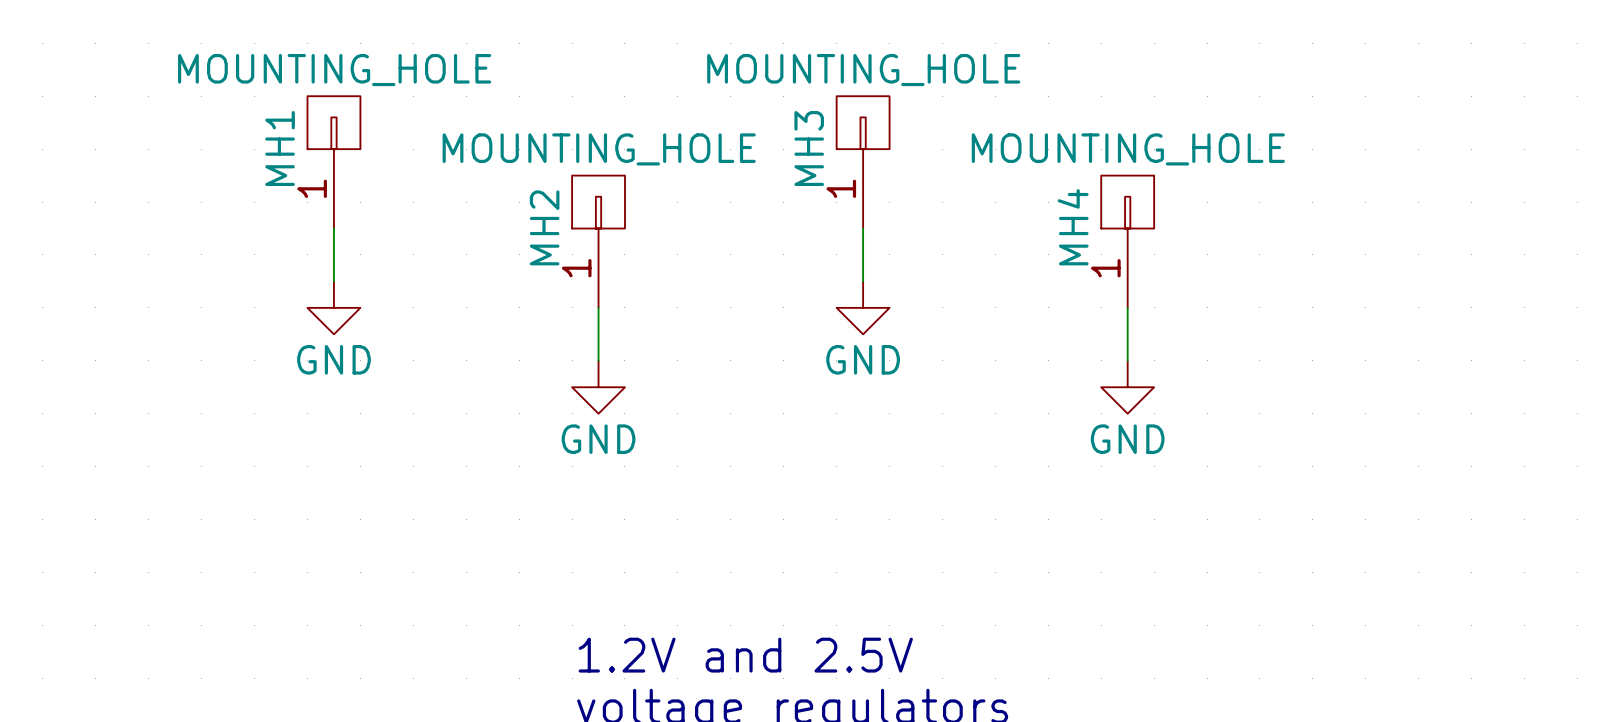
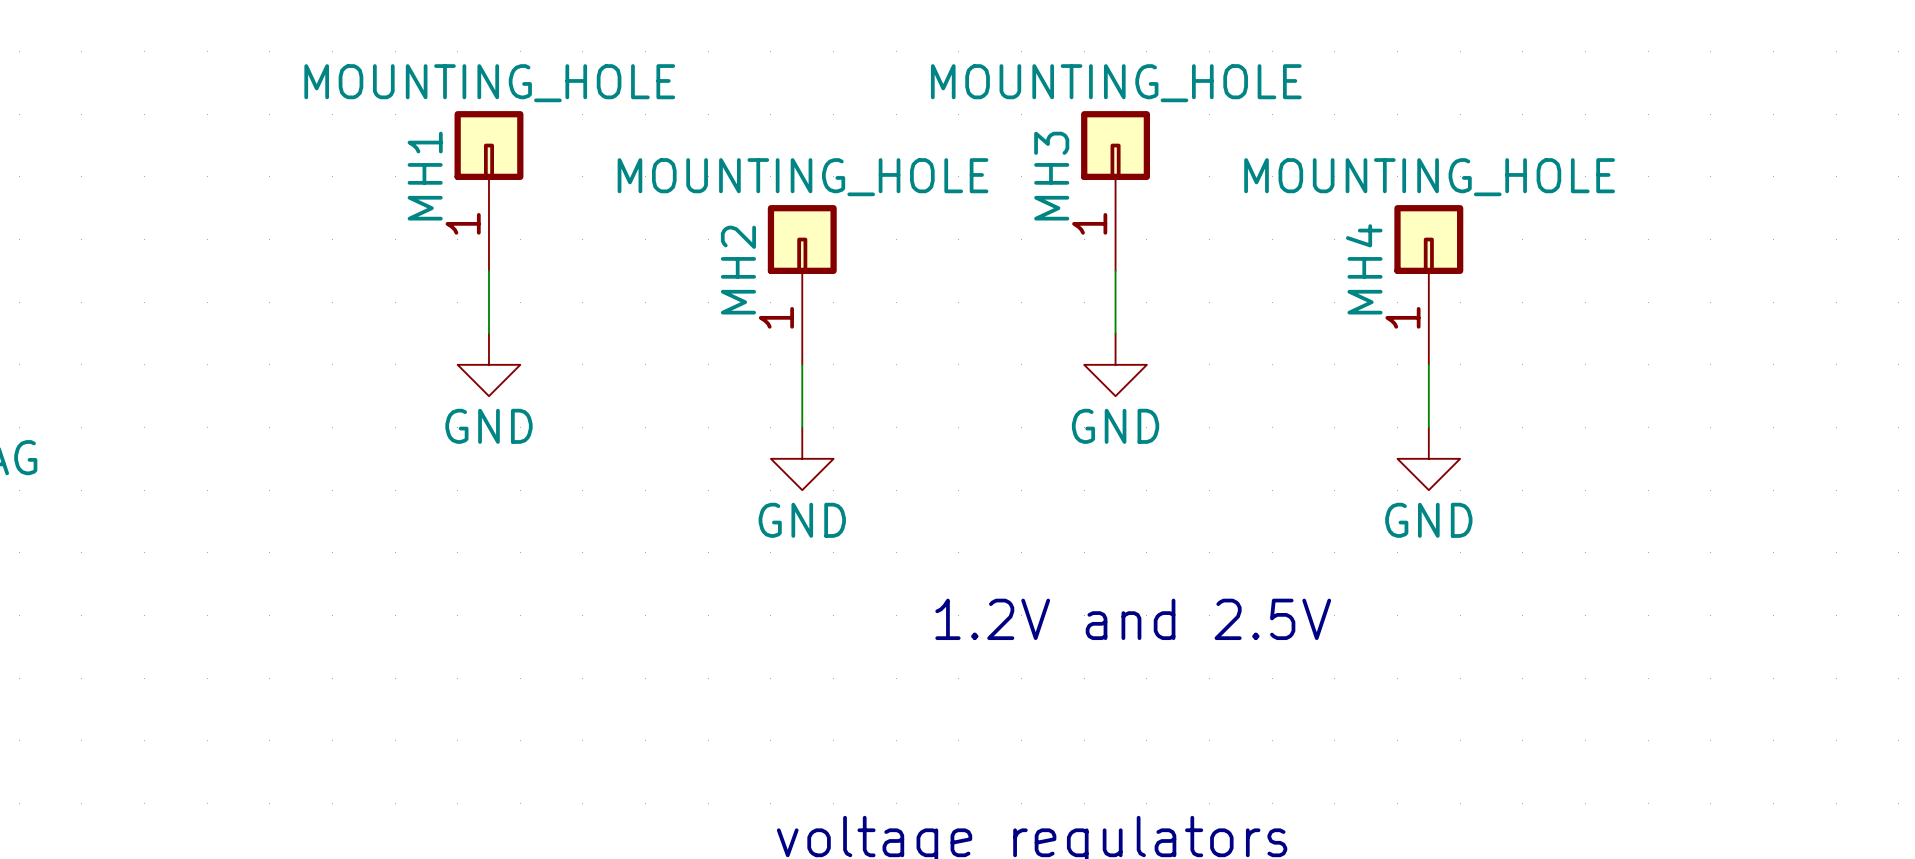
MH1 symbol: [307, 96, 361, 229] -> [454, 111, 524, 271]
MH3 symbol: [836, 96, 890, 229] -> [1081, 111, 1151, 271]
MH2 symbol: [572, 175, 625, 308] -> [767, 205, 837, 365]
MH4 symbol: [1101, 175, 1155, 308] -> [1394, 205, 1464, 365]
text position: 1.2V and 2.5V (745, 655) -> 1.2V and 2.5V (1133, 619)

